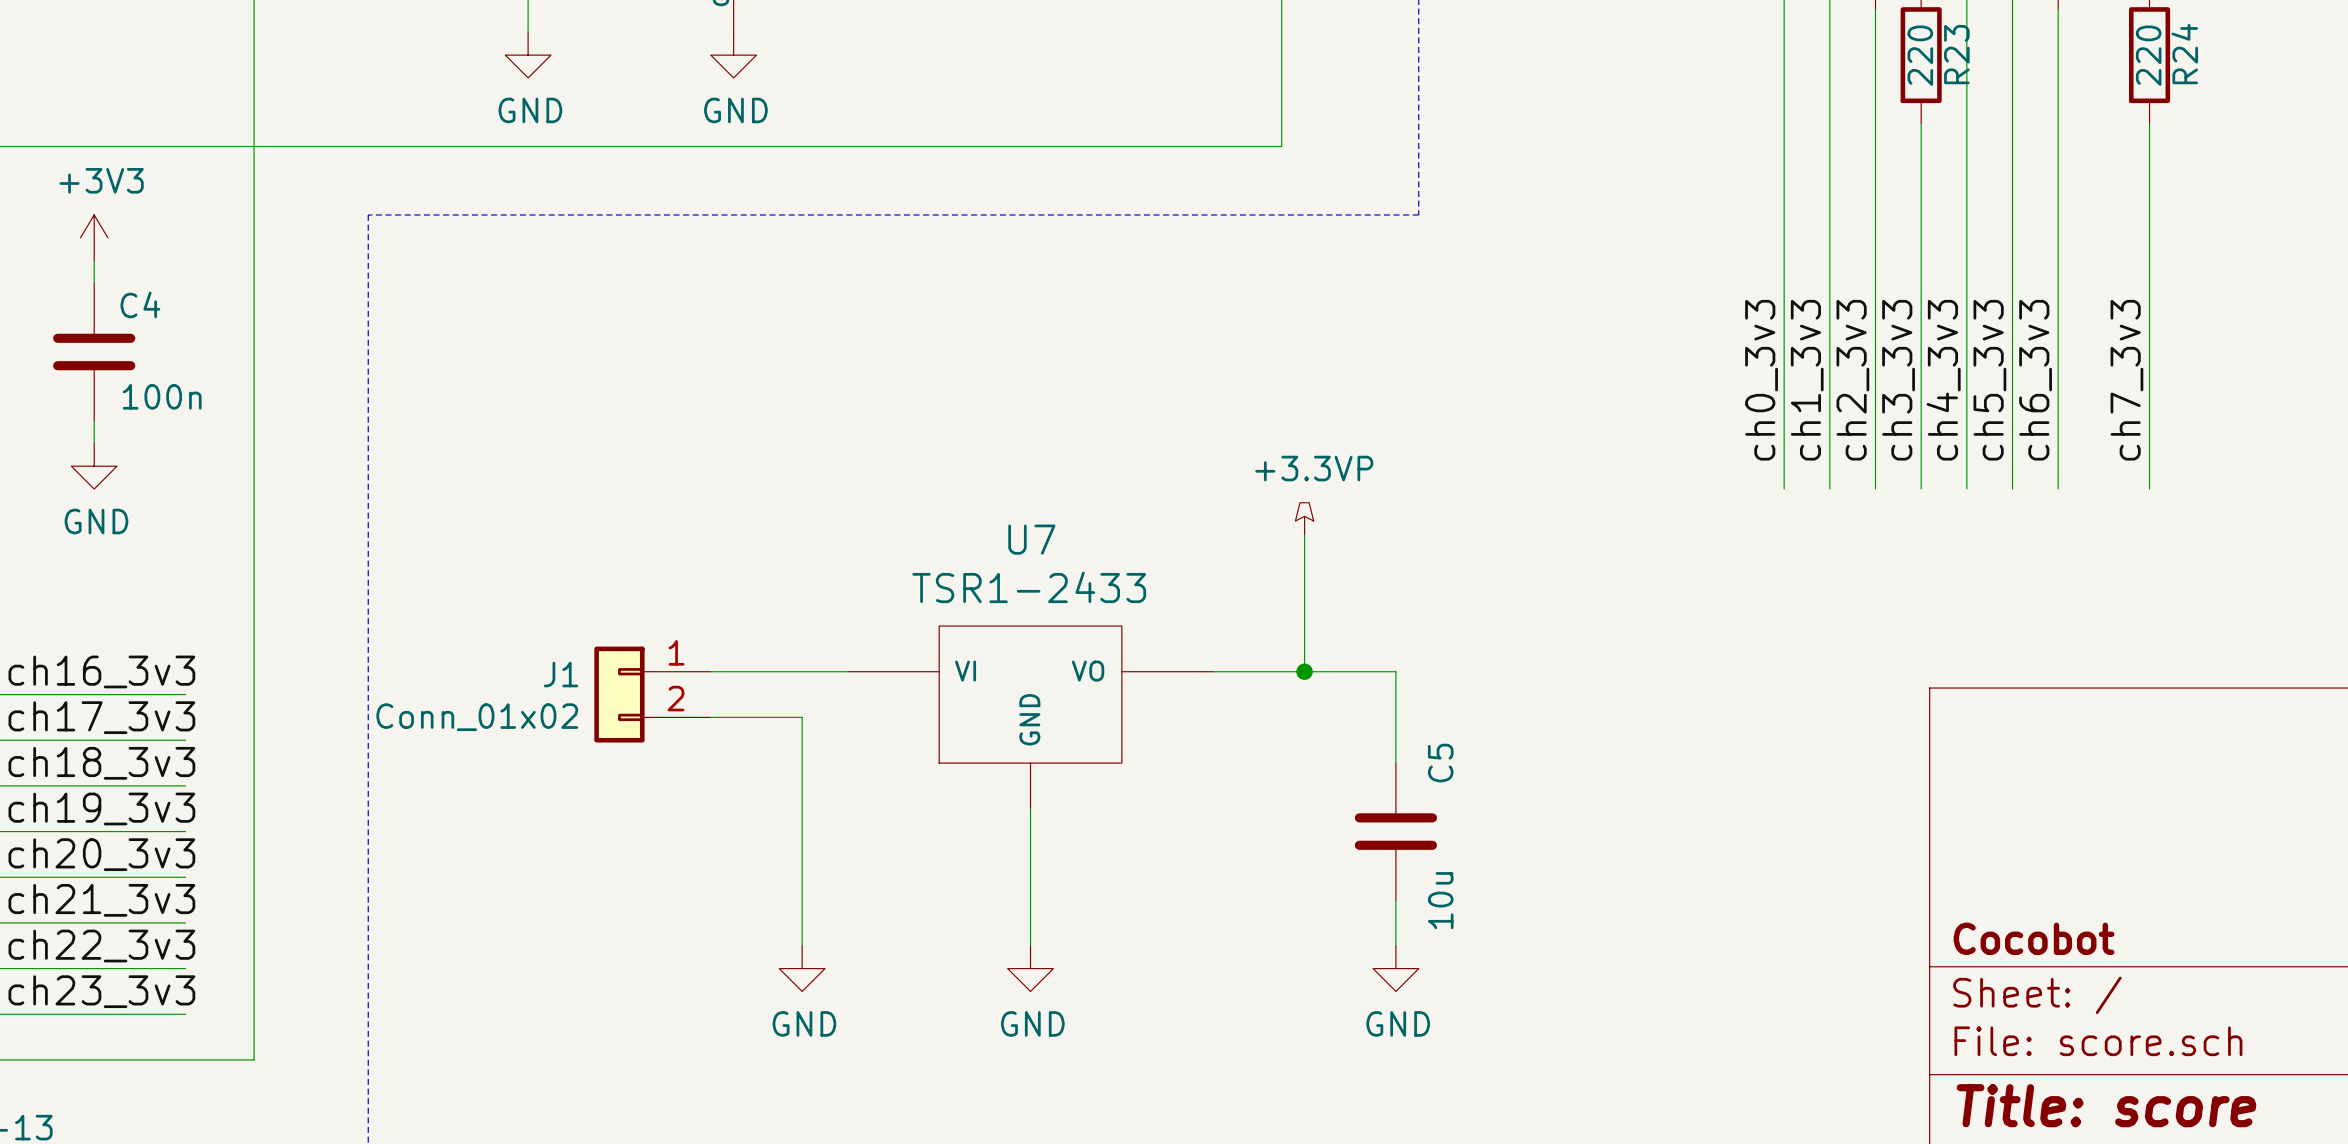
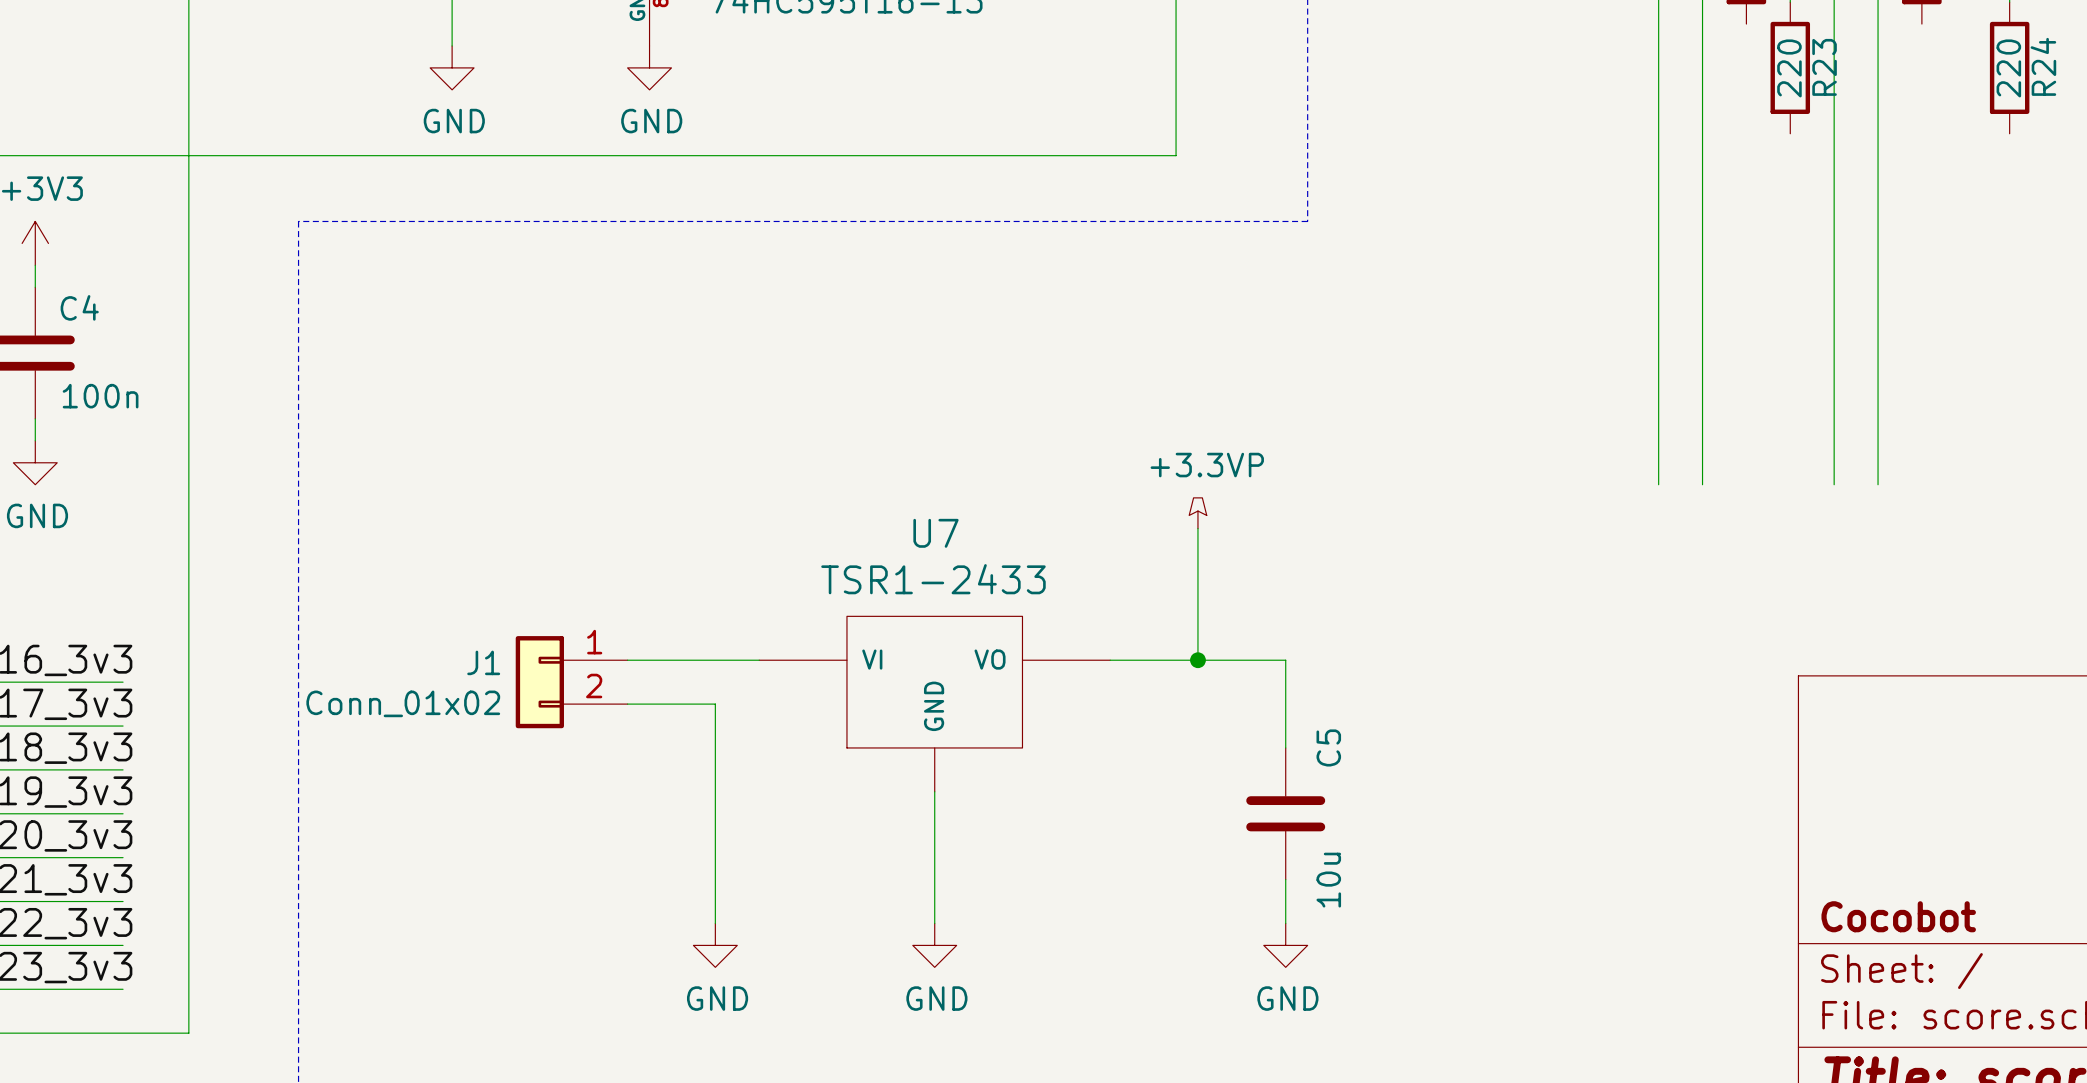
wire: (1875, 9) (1875, 489) -> none
wire: (2058, 9) (2058, 489) -> none
wire: (1921, 123) (1921, 489) -> none
wire: (2149, 123) (2149, 489) -> none
label: ch0_3v3 (1761, 380) -> none
label: ch1_3v3 (1807, 380) -> none
label: ch2_3v3 (1852, 380) -> none
label: ch3_3v3 (1898, 380) -> none
label: ch4_3v3 (1943, 380) -> none
label: ch5_3v3 (1989, 380) -> none
label: ch6_3v3 (2035, 380) -> none
label: ch7_3v3 (2126, 380) -> none

